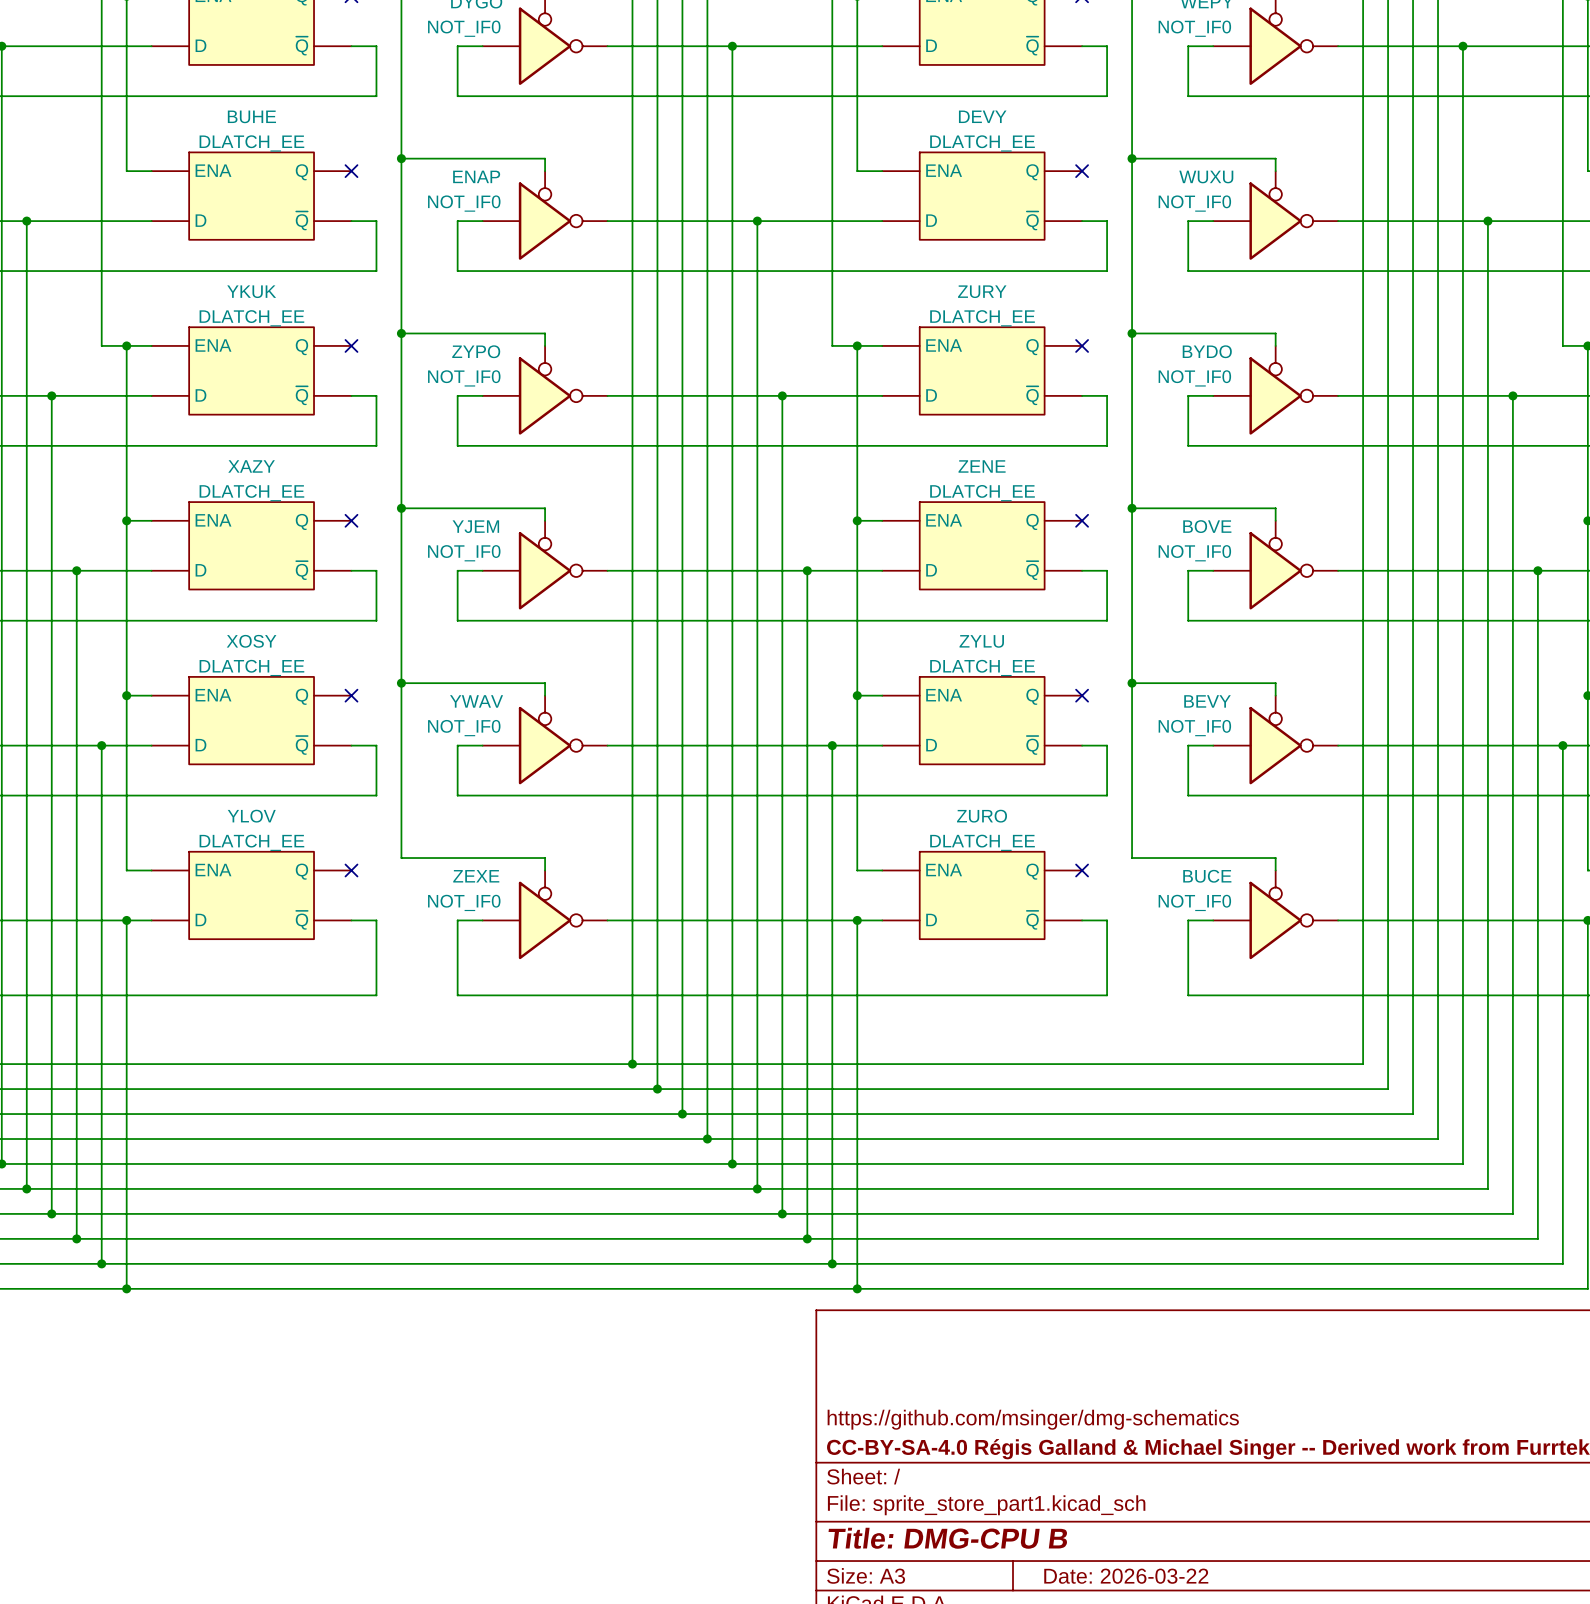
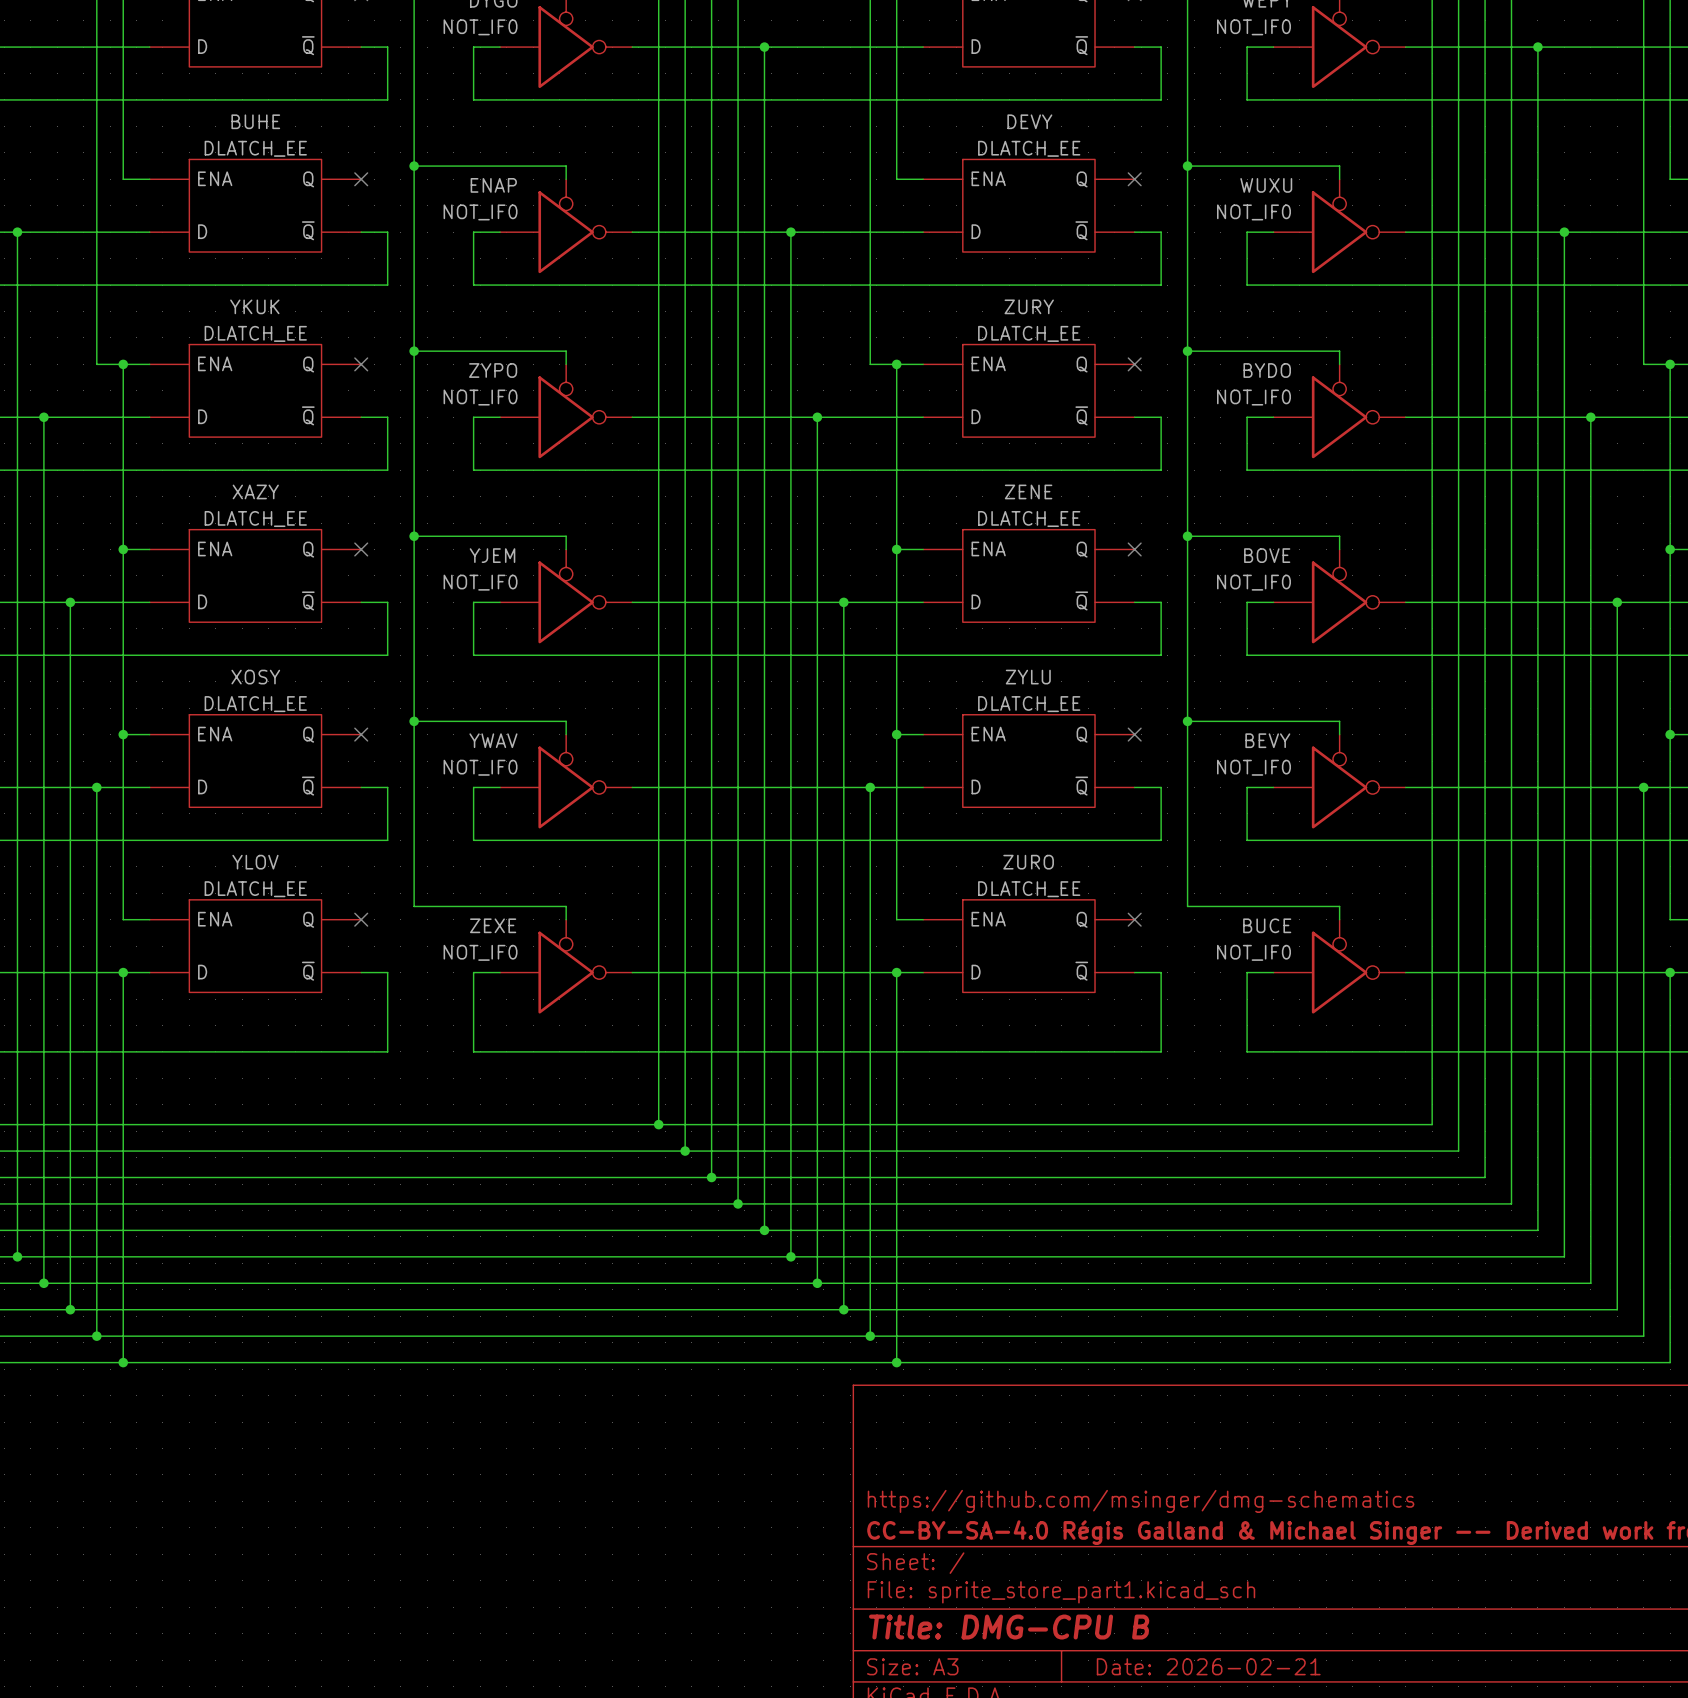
title block: Date: 2026-03-22 (1126, 1576) -> Date: 2026-02-21 (1208, 1666)

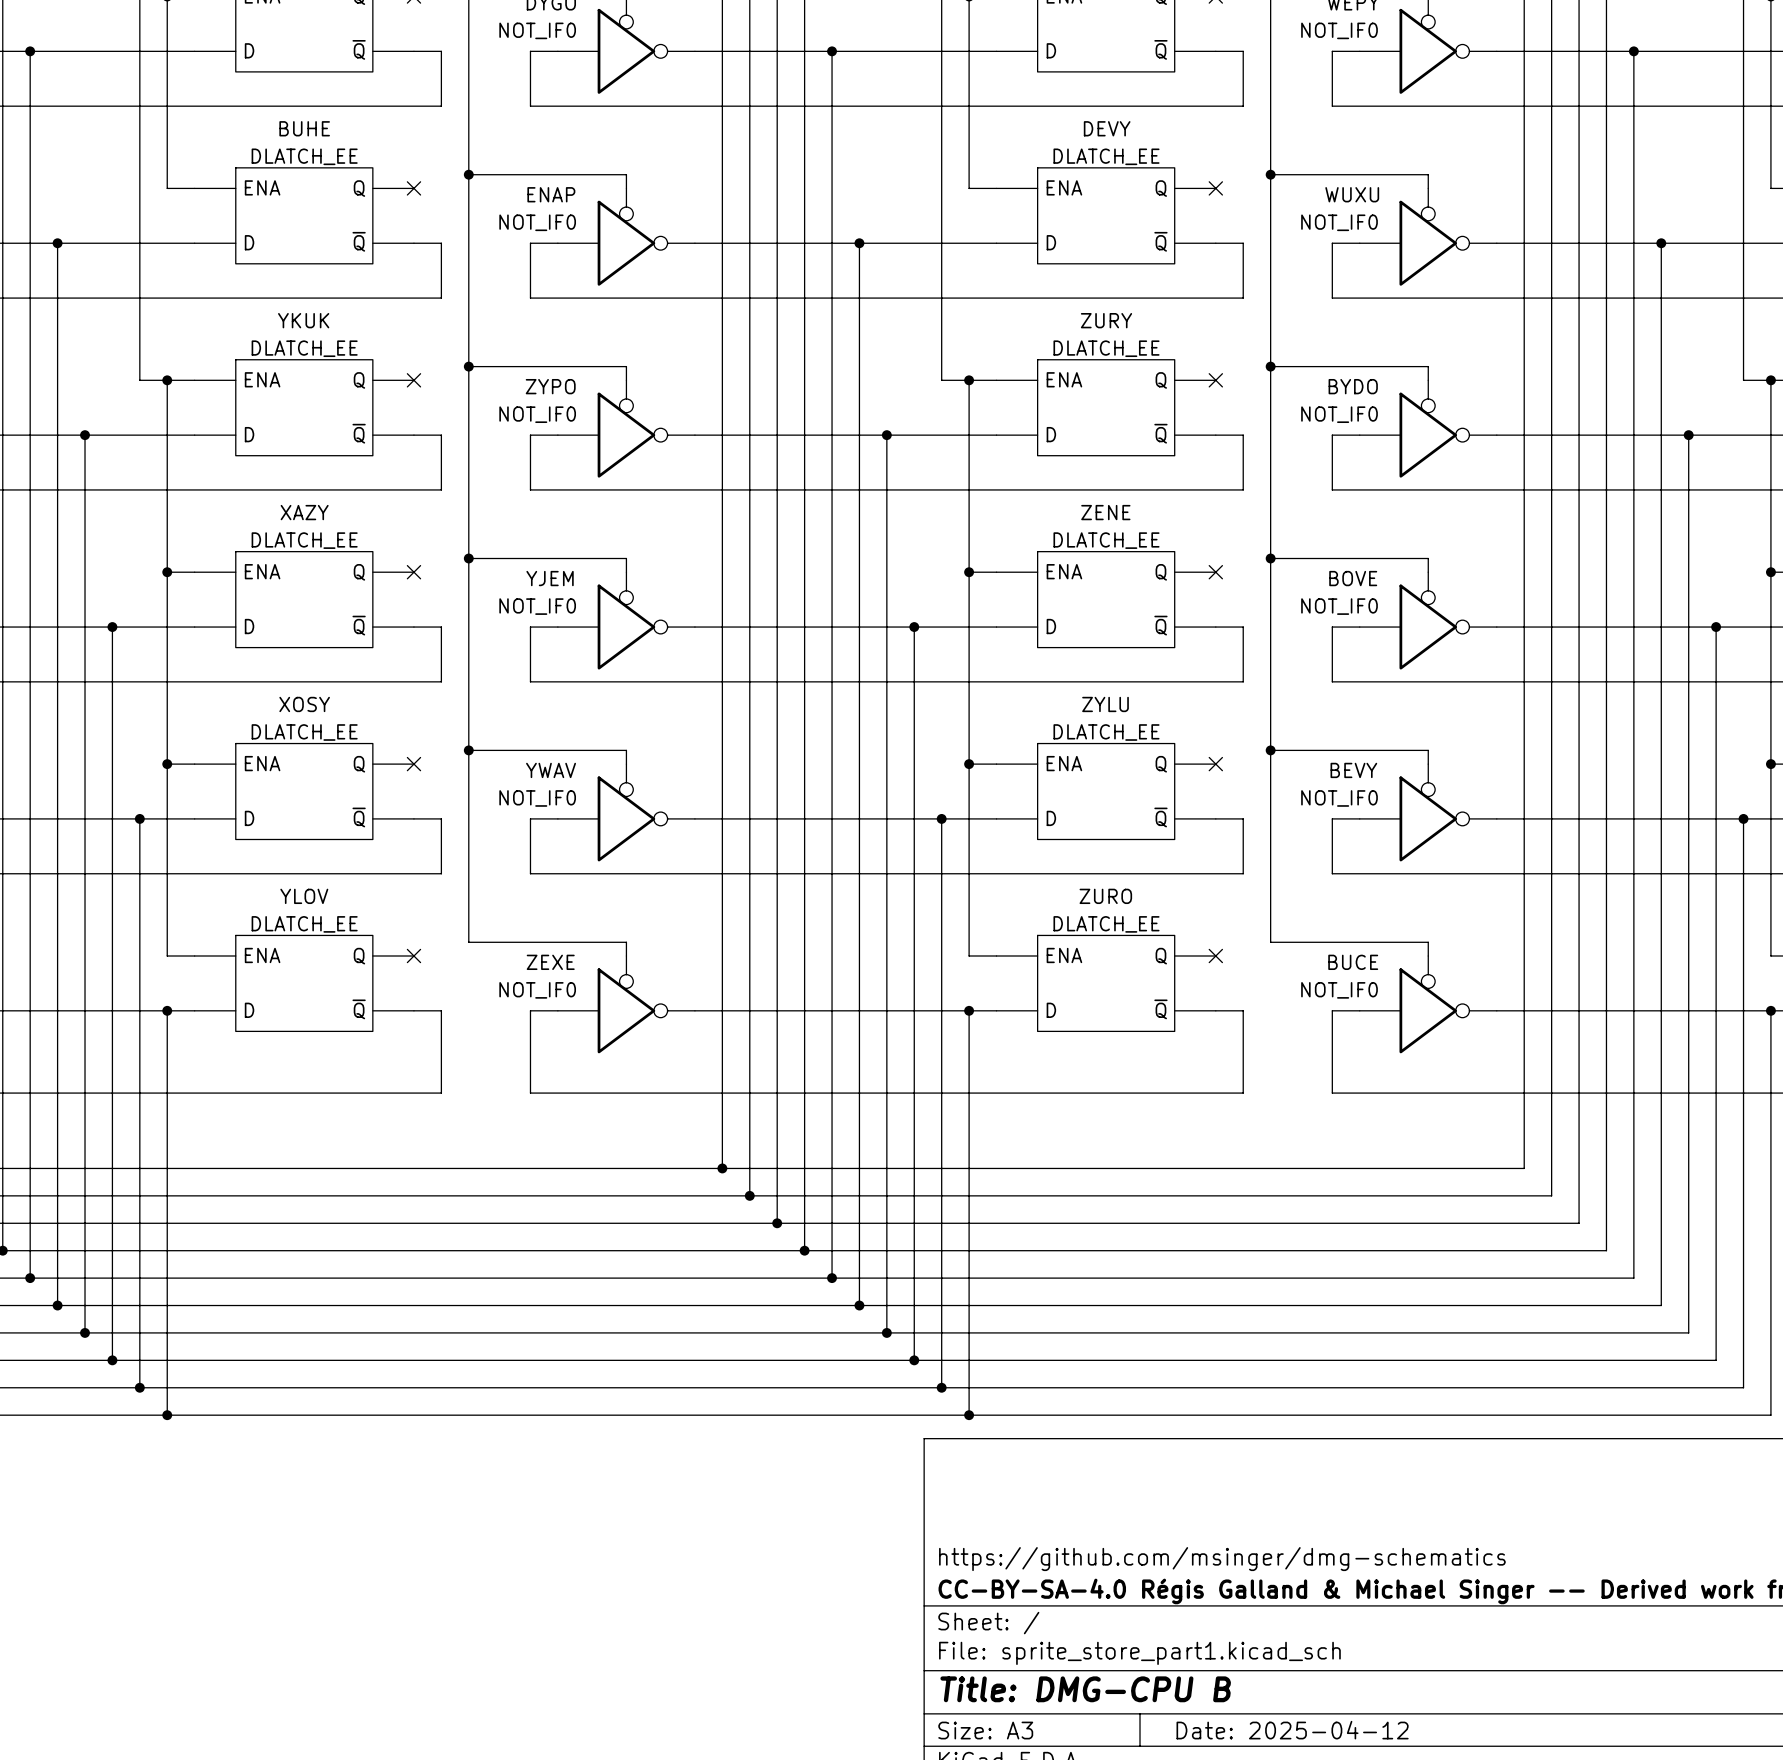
title block: Date: 2026-02-21 (1208, 1666) -> Date: 2025-04-12 (1292, 1730)

